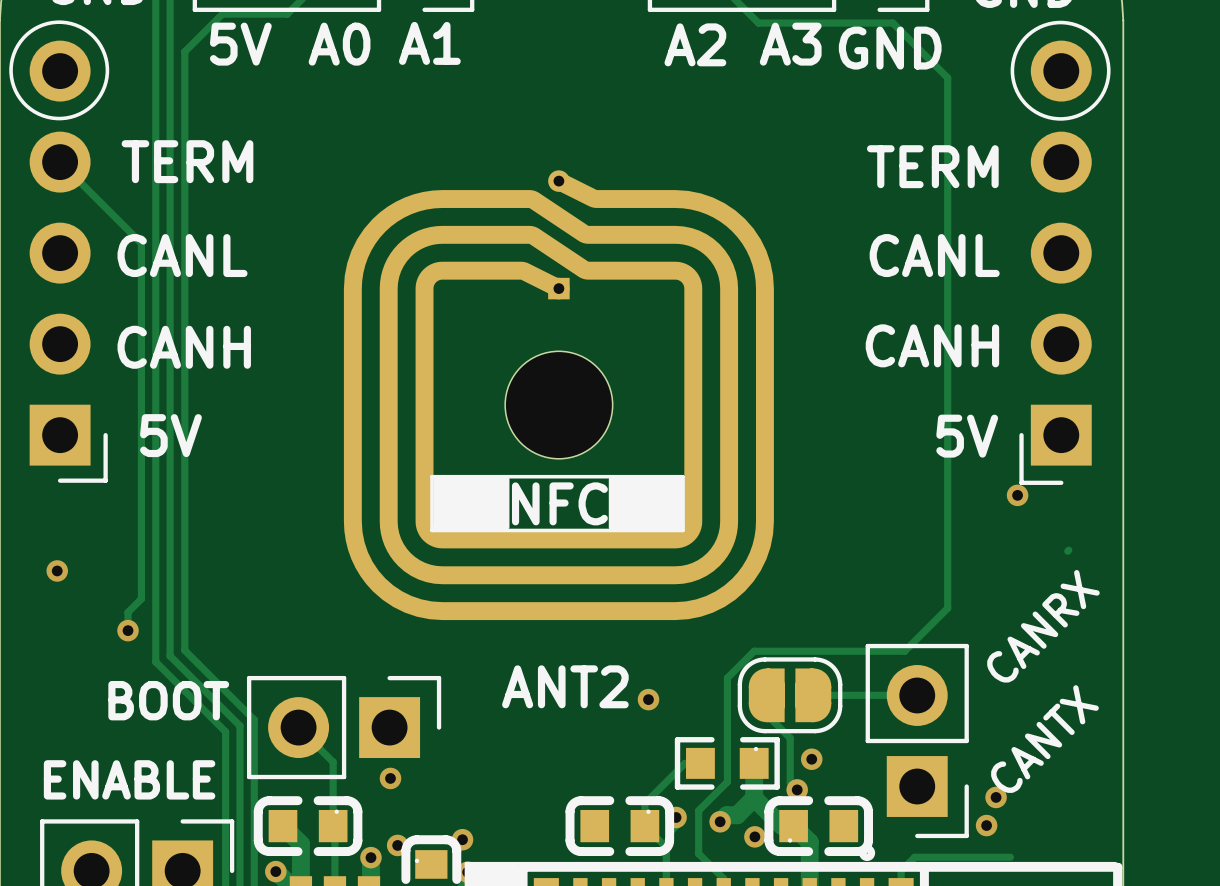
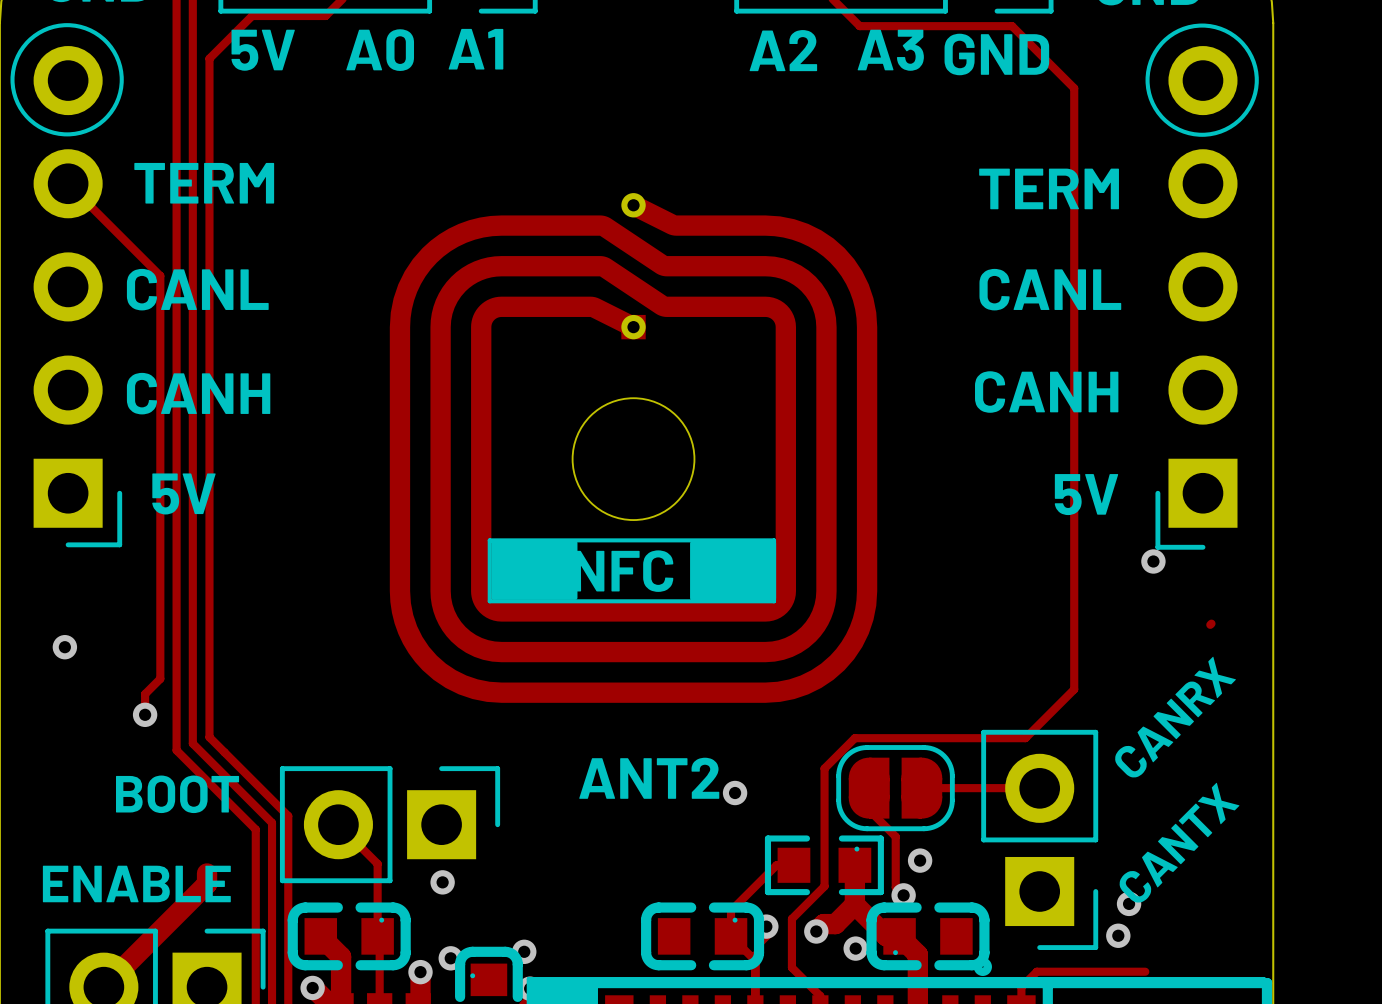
track: none -> (207, 873) (207, 883) (103, 987)

